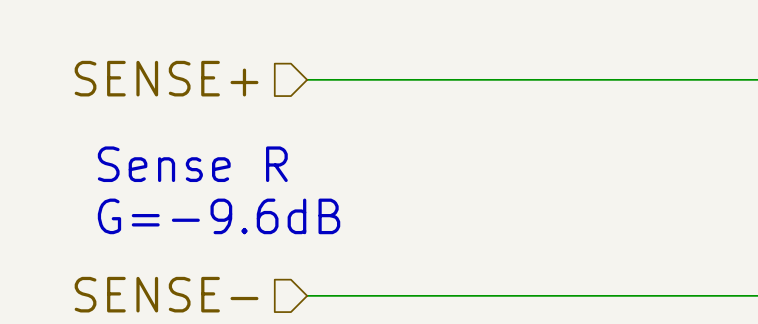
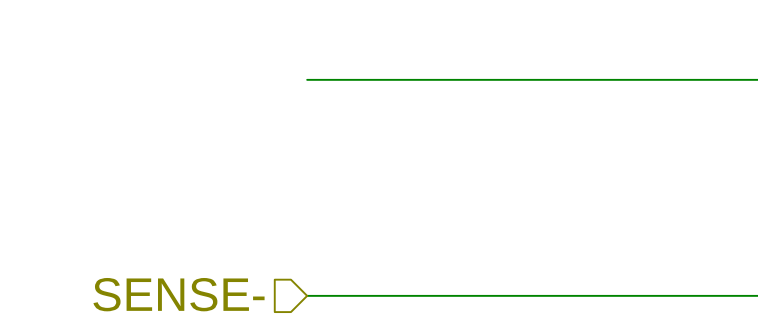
hierarchical label: SENSE+ (166, 78) -> none
text: Sense R (192, 164) -> none
text: G=-9.6dB (219, 216) -> none

